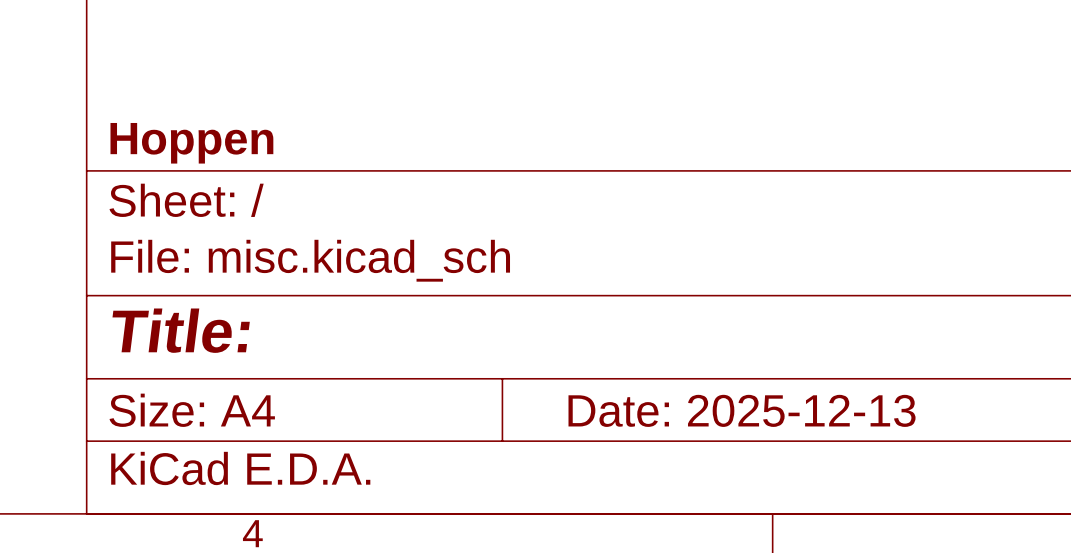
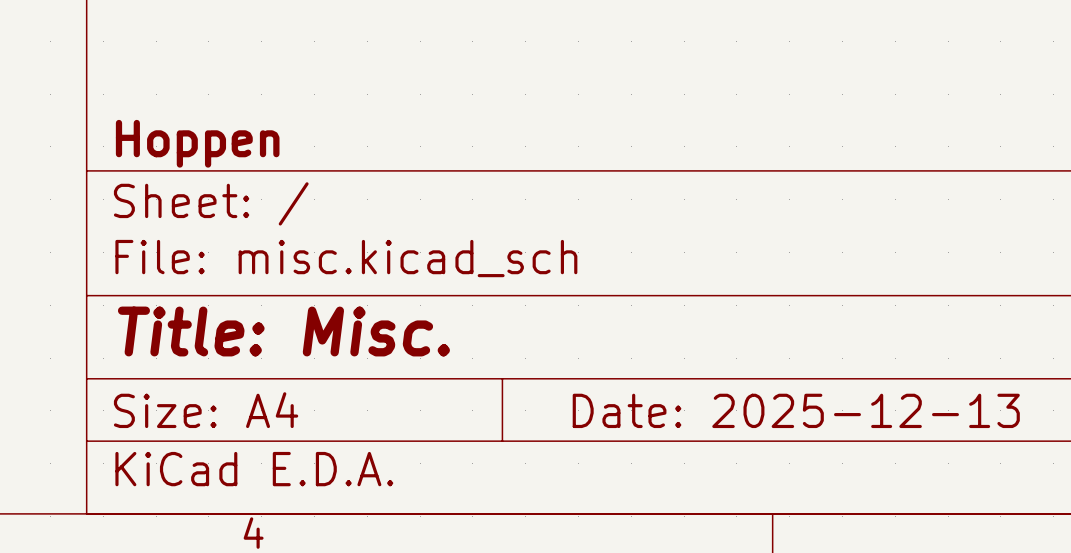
title block: Title: (181, 330) -> Title: Misc. (283, 331)

